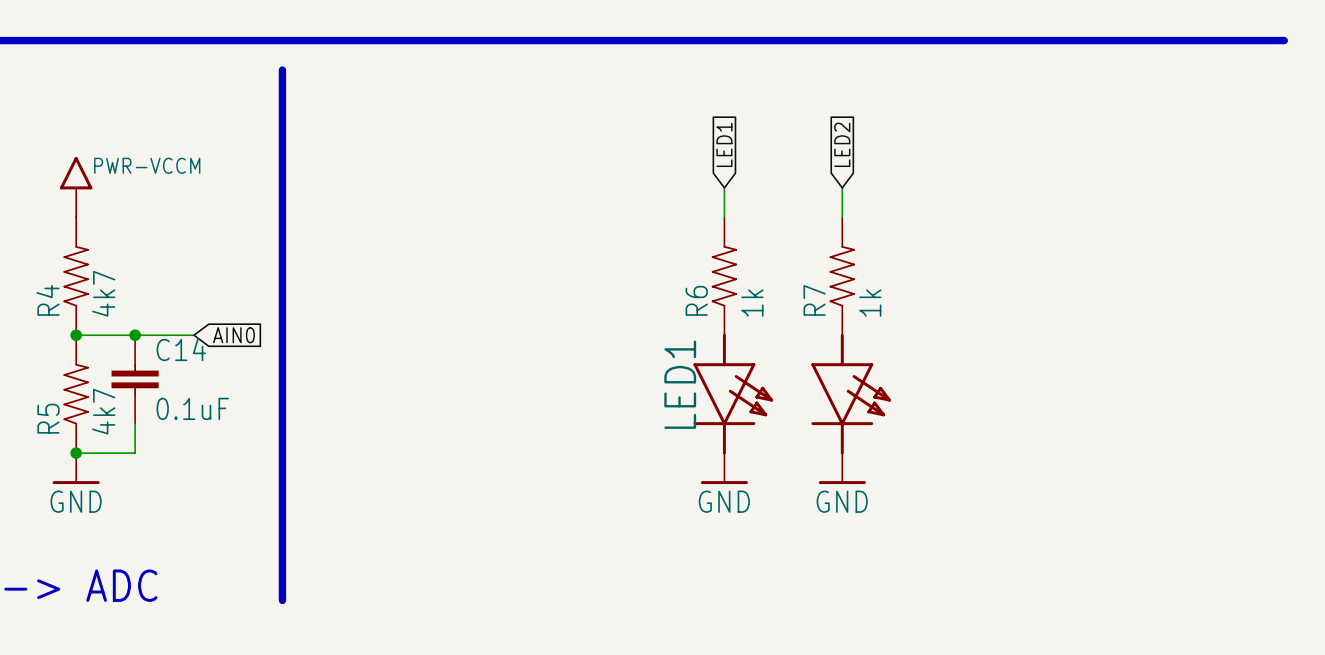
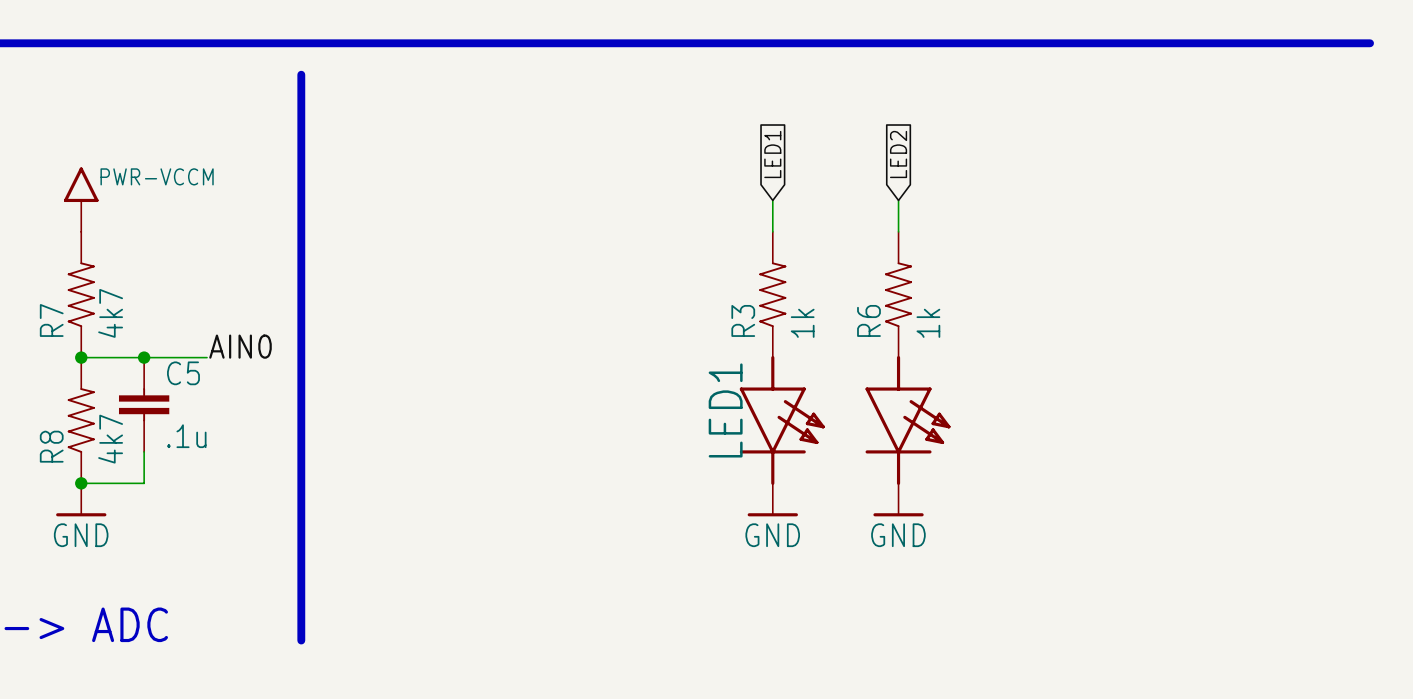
R4 name: R4 (47, 300) -> R7 (51, 320)
R6 name: R6 (696, 300) -> R3 (743, 320)
R7 name: R7 (814, 300) -> R6 (868, 320)
label: none -> AIN0 (240, 346)
global label: AIN0 (233, 335) -> none
C14 name: C14 (181, 349) -> C5 (183, 373)
C14 value: 0.1uF (192, 408) -> .1u (186, 436)
R5 name: R5 (48, 418) -> R8 (51, 446)

